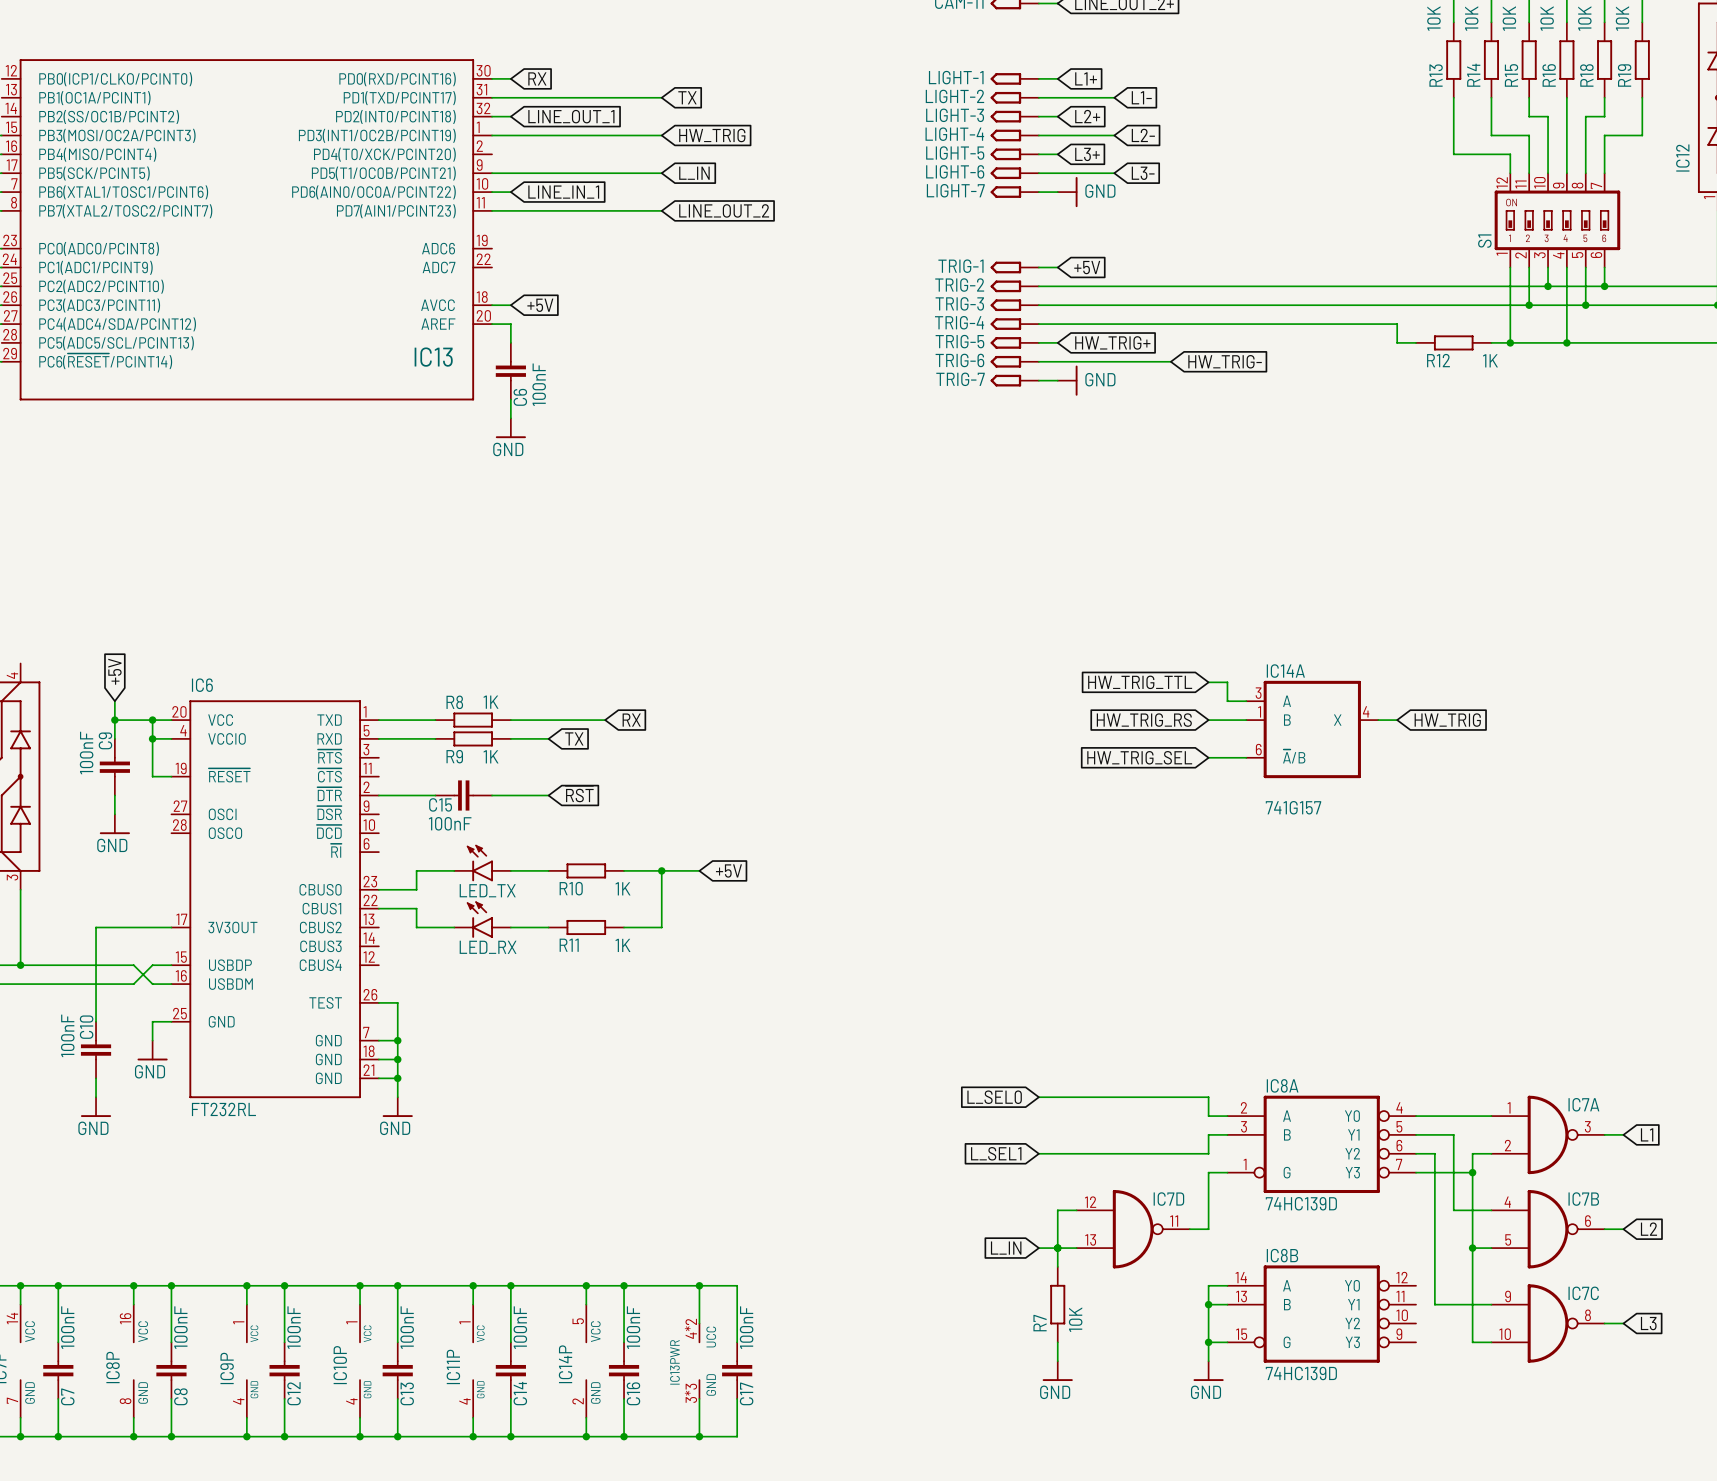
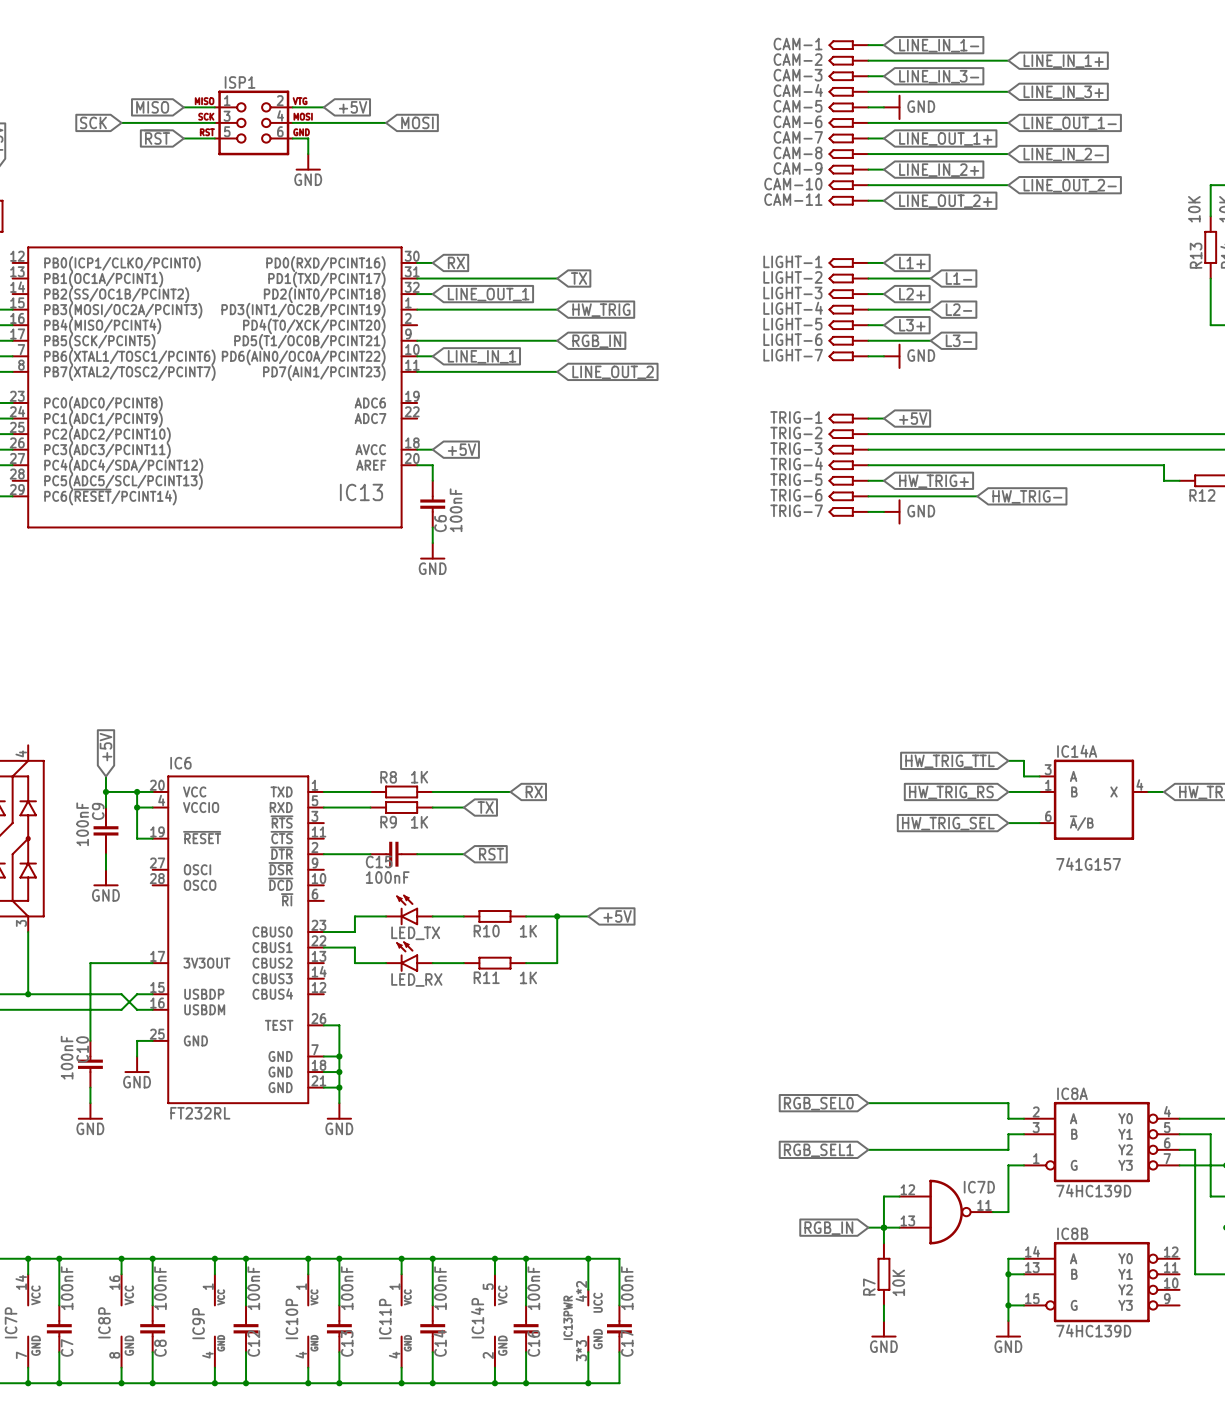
global label: L_IN (694, 173) -> RGB_IN (596, 341)
global label: L_SEL0 (994, 1097) -> RGB_SEL0 (818, 1103)
global label: L_SEL1 (996, 1153) -> RGB_SEL1 (818, 1150)
global label: L_IN (1006, 1248) -> RGB_IN (828, 1228)

